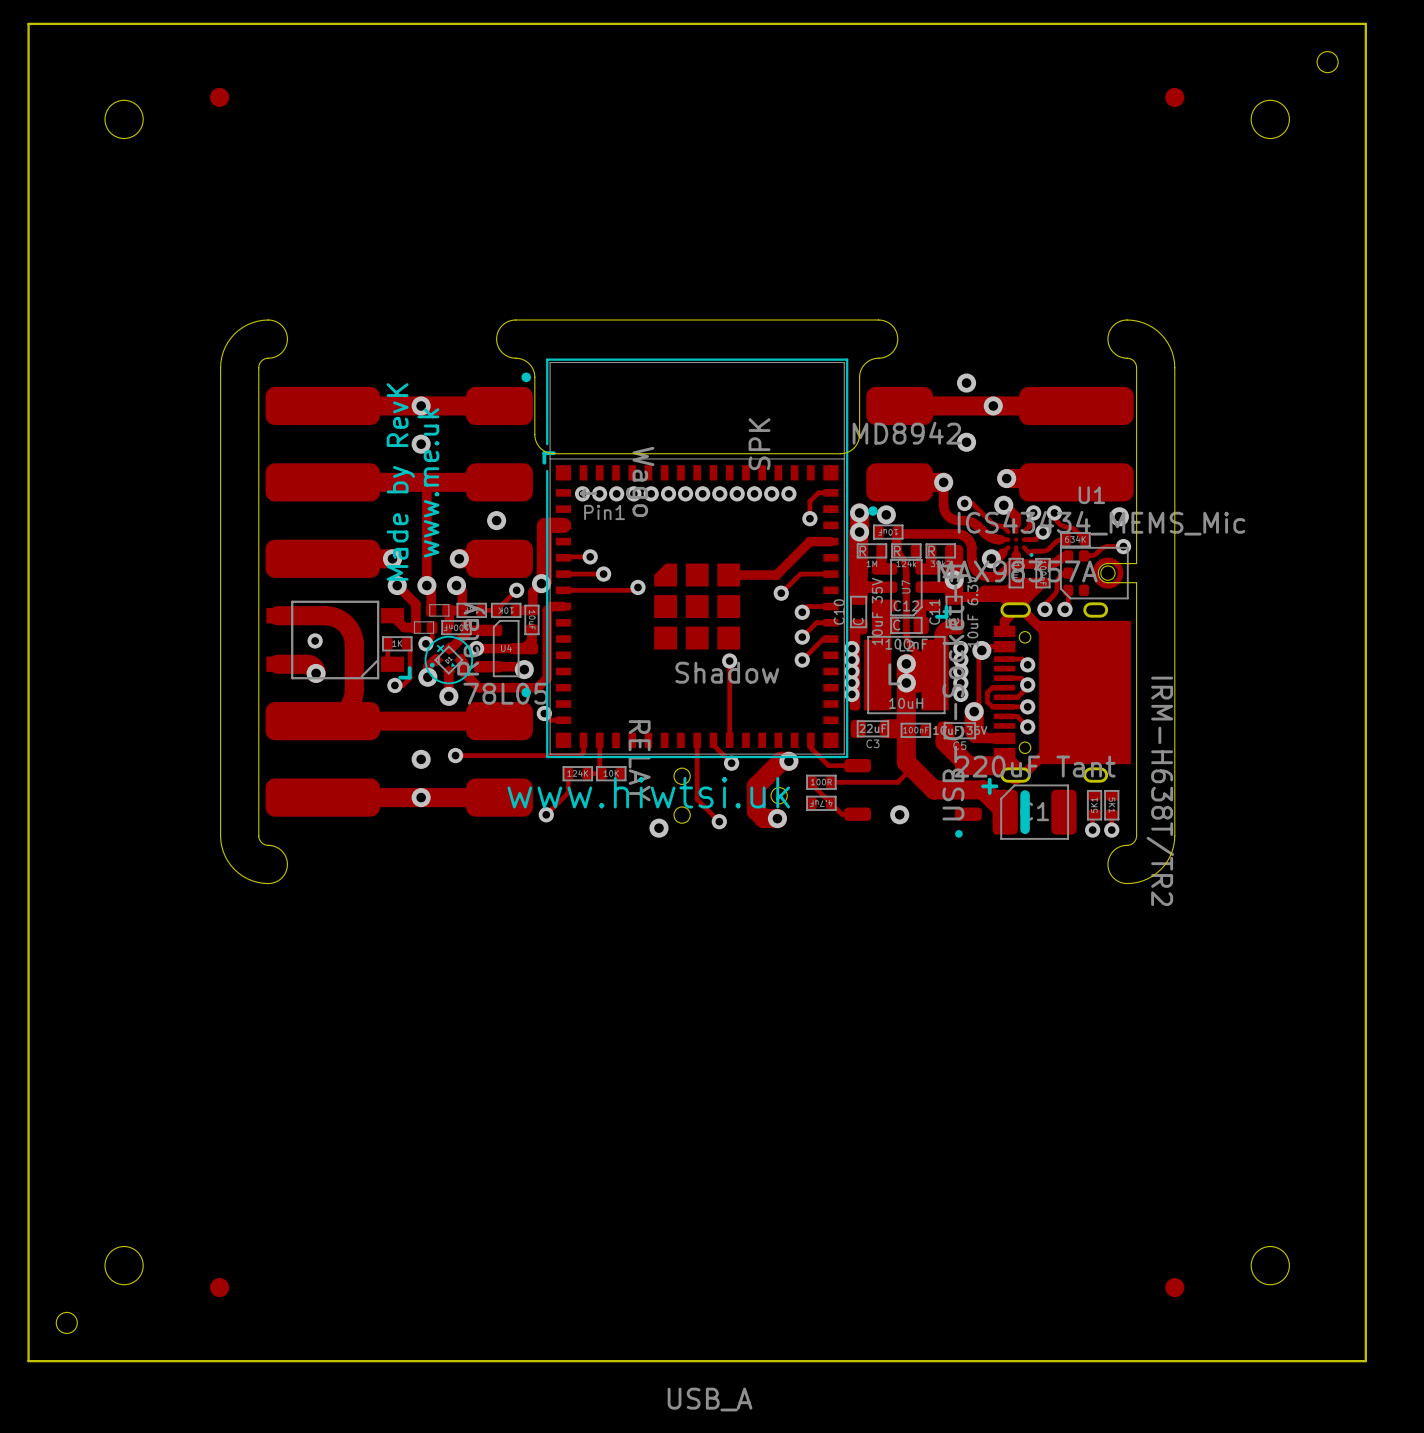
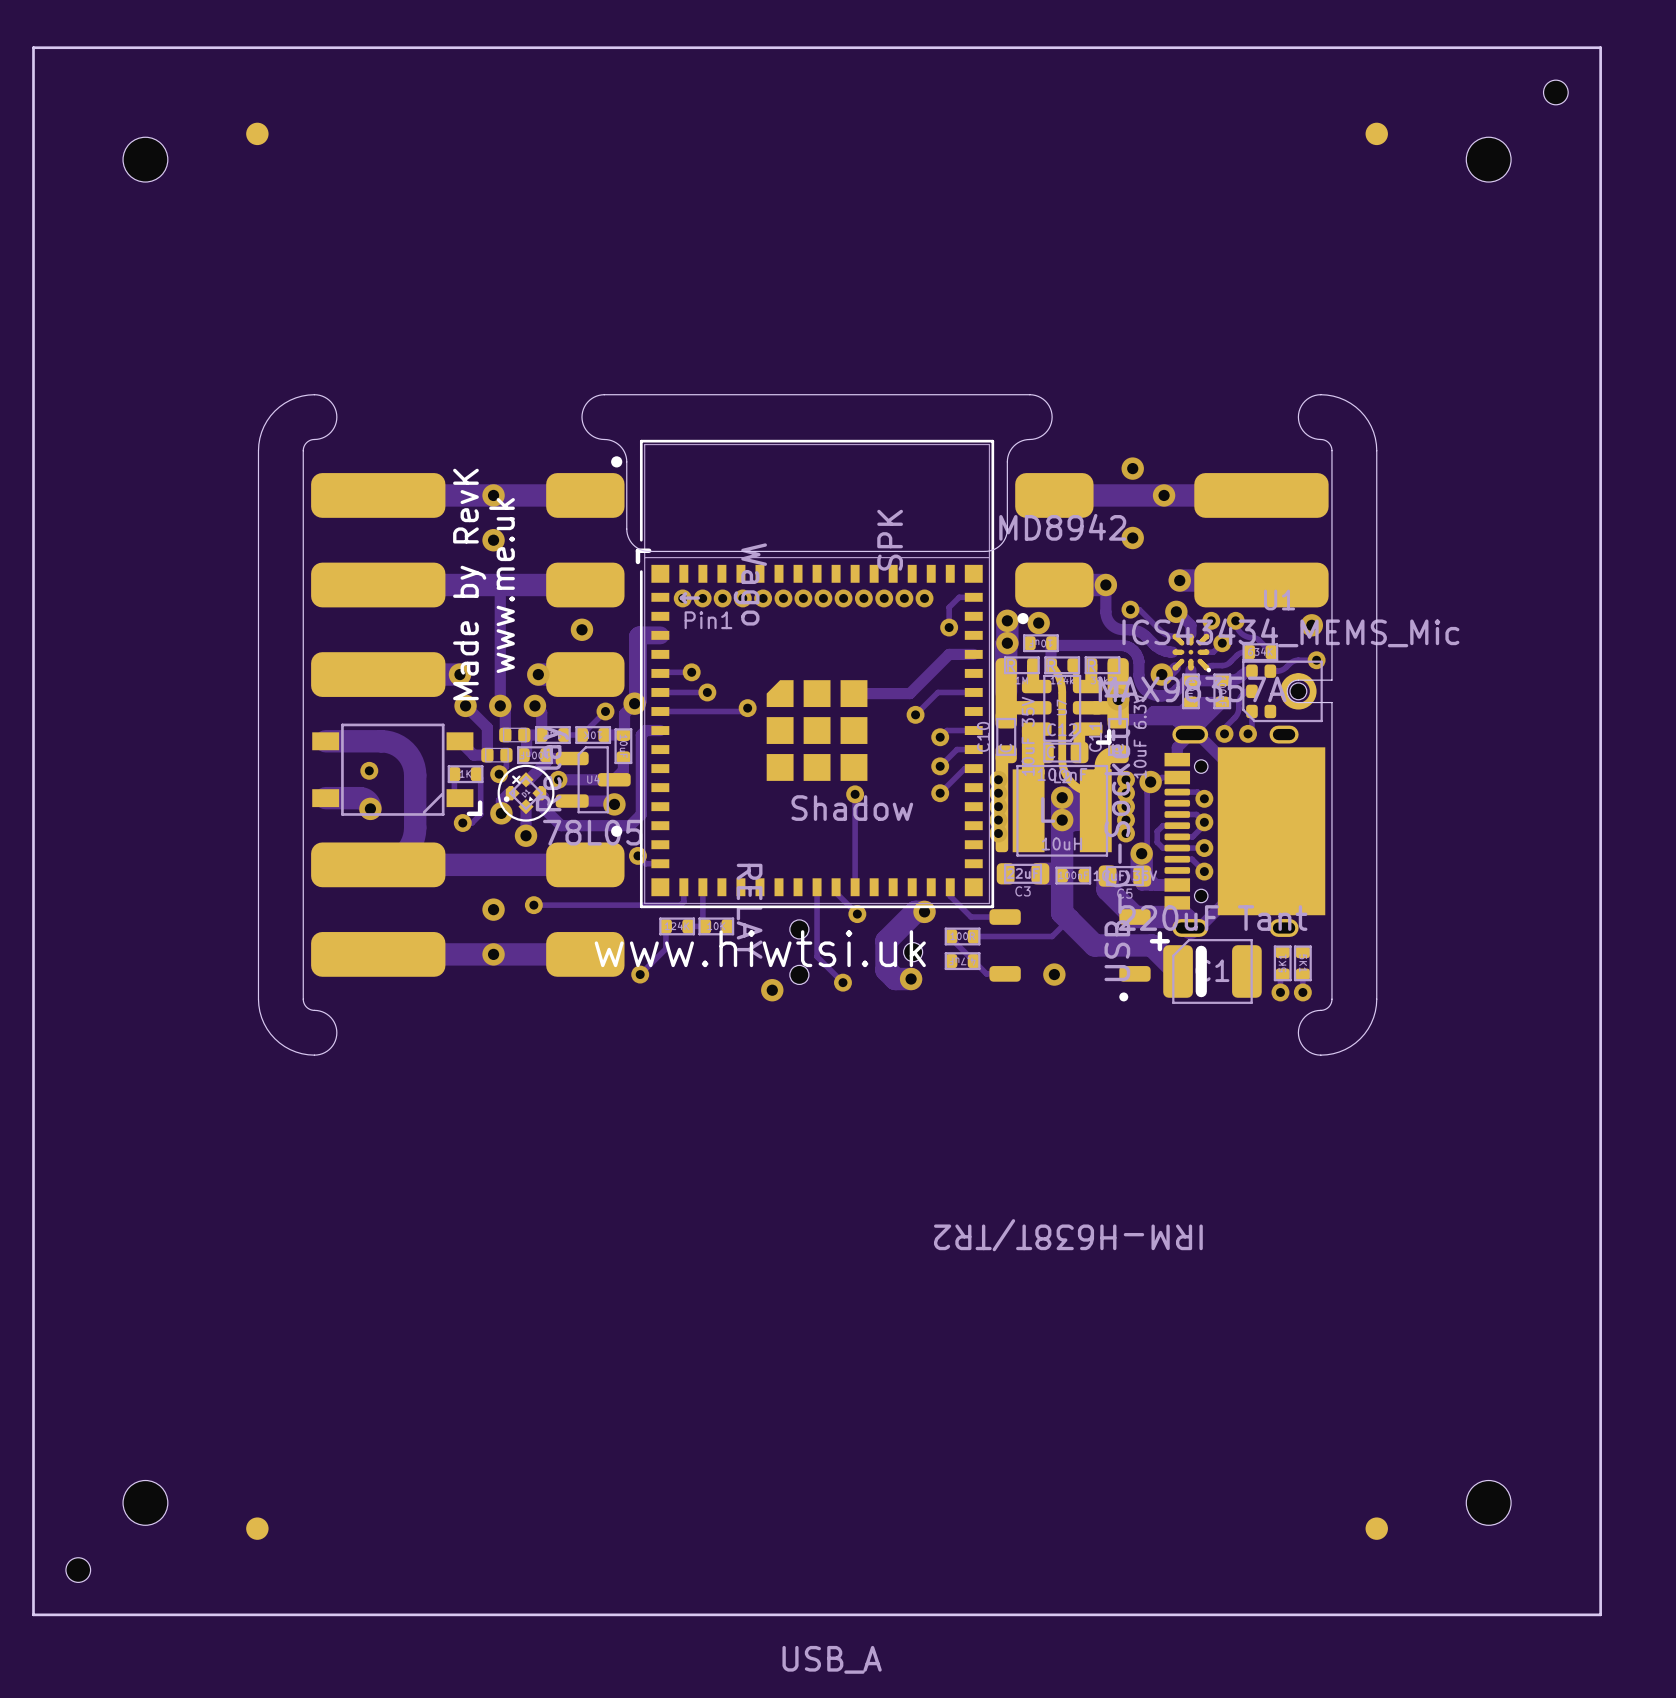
part value rotation: 0° (1160, 791) -> 90° clockwise (1068, 1235)
part value position: IRM-H638T/TR2 (1160, 791) -> IRM-H638T/TR2 (1068, 1235)

